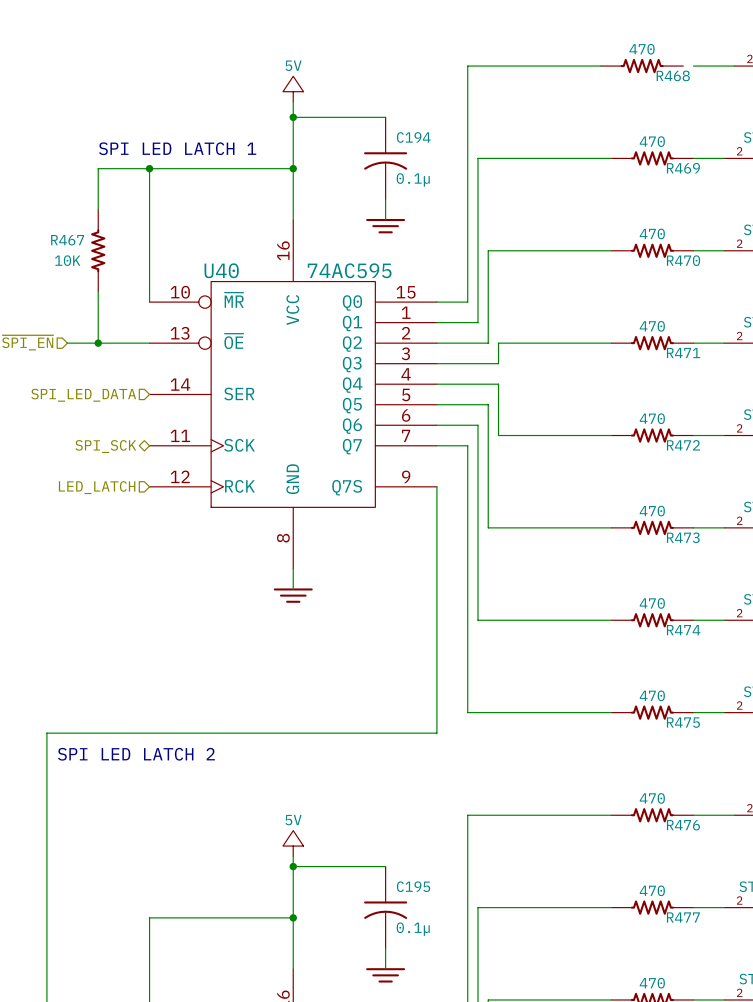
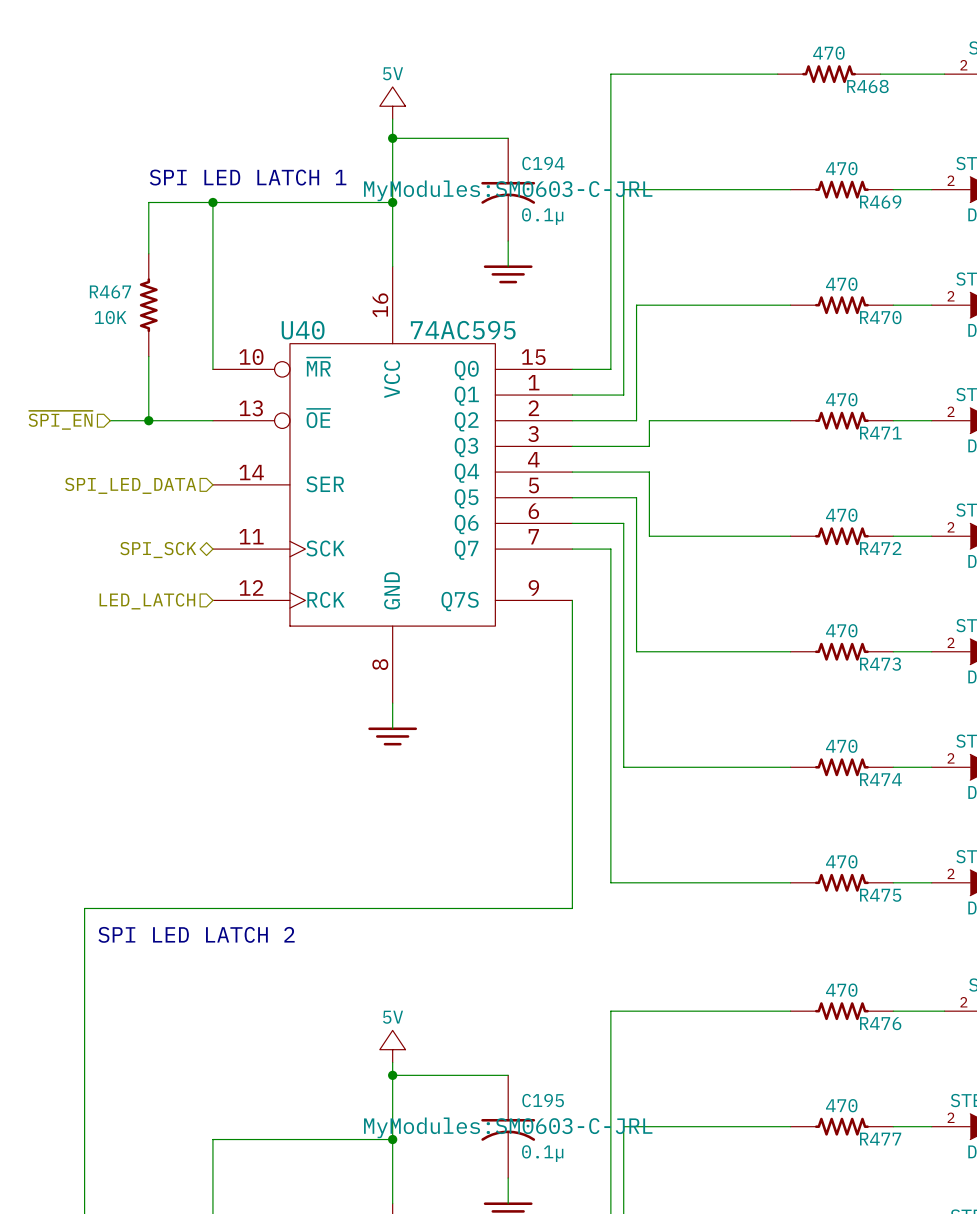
wire: none -> (880, 74) (893, 74)
C194 text: none -> MyModules:SM0603-C-JRL (508, 190)
C195 text: none -> MyModules:SM0603-C-JRL (508, 1127)

